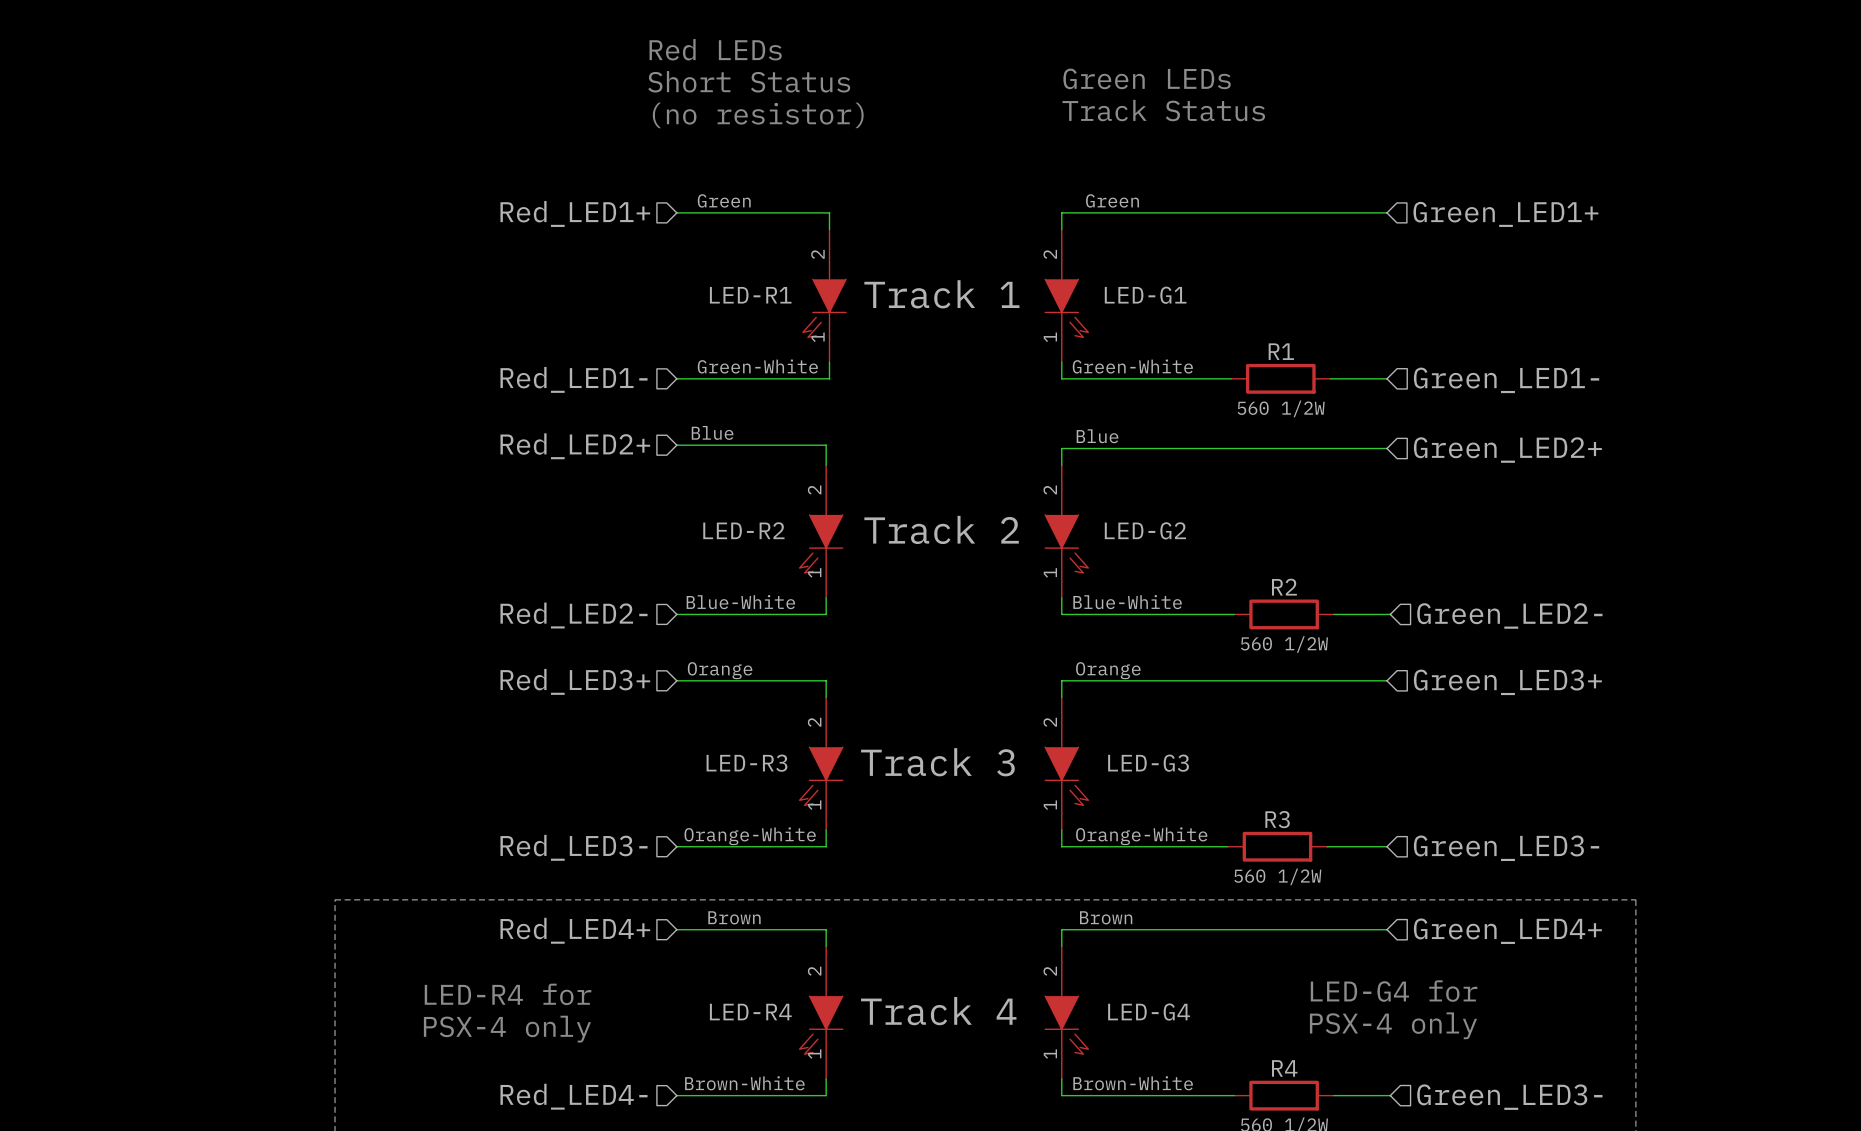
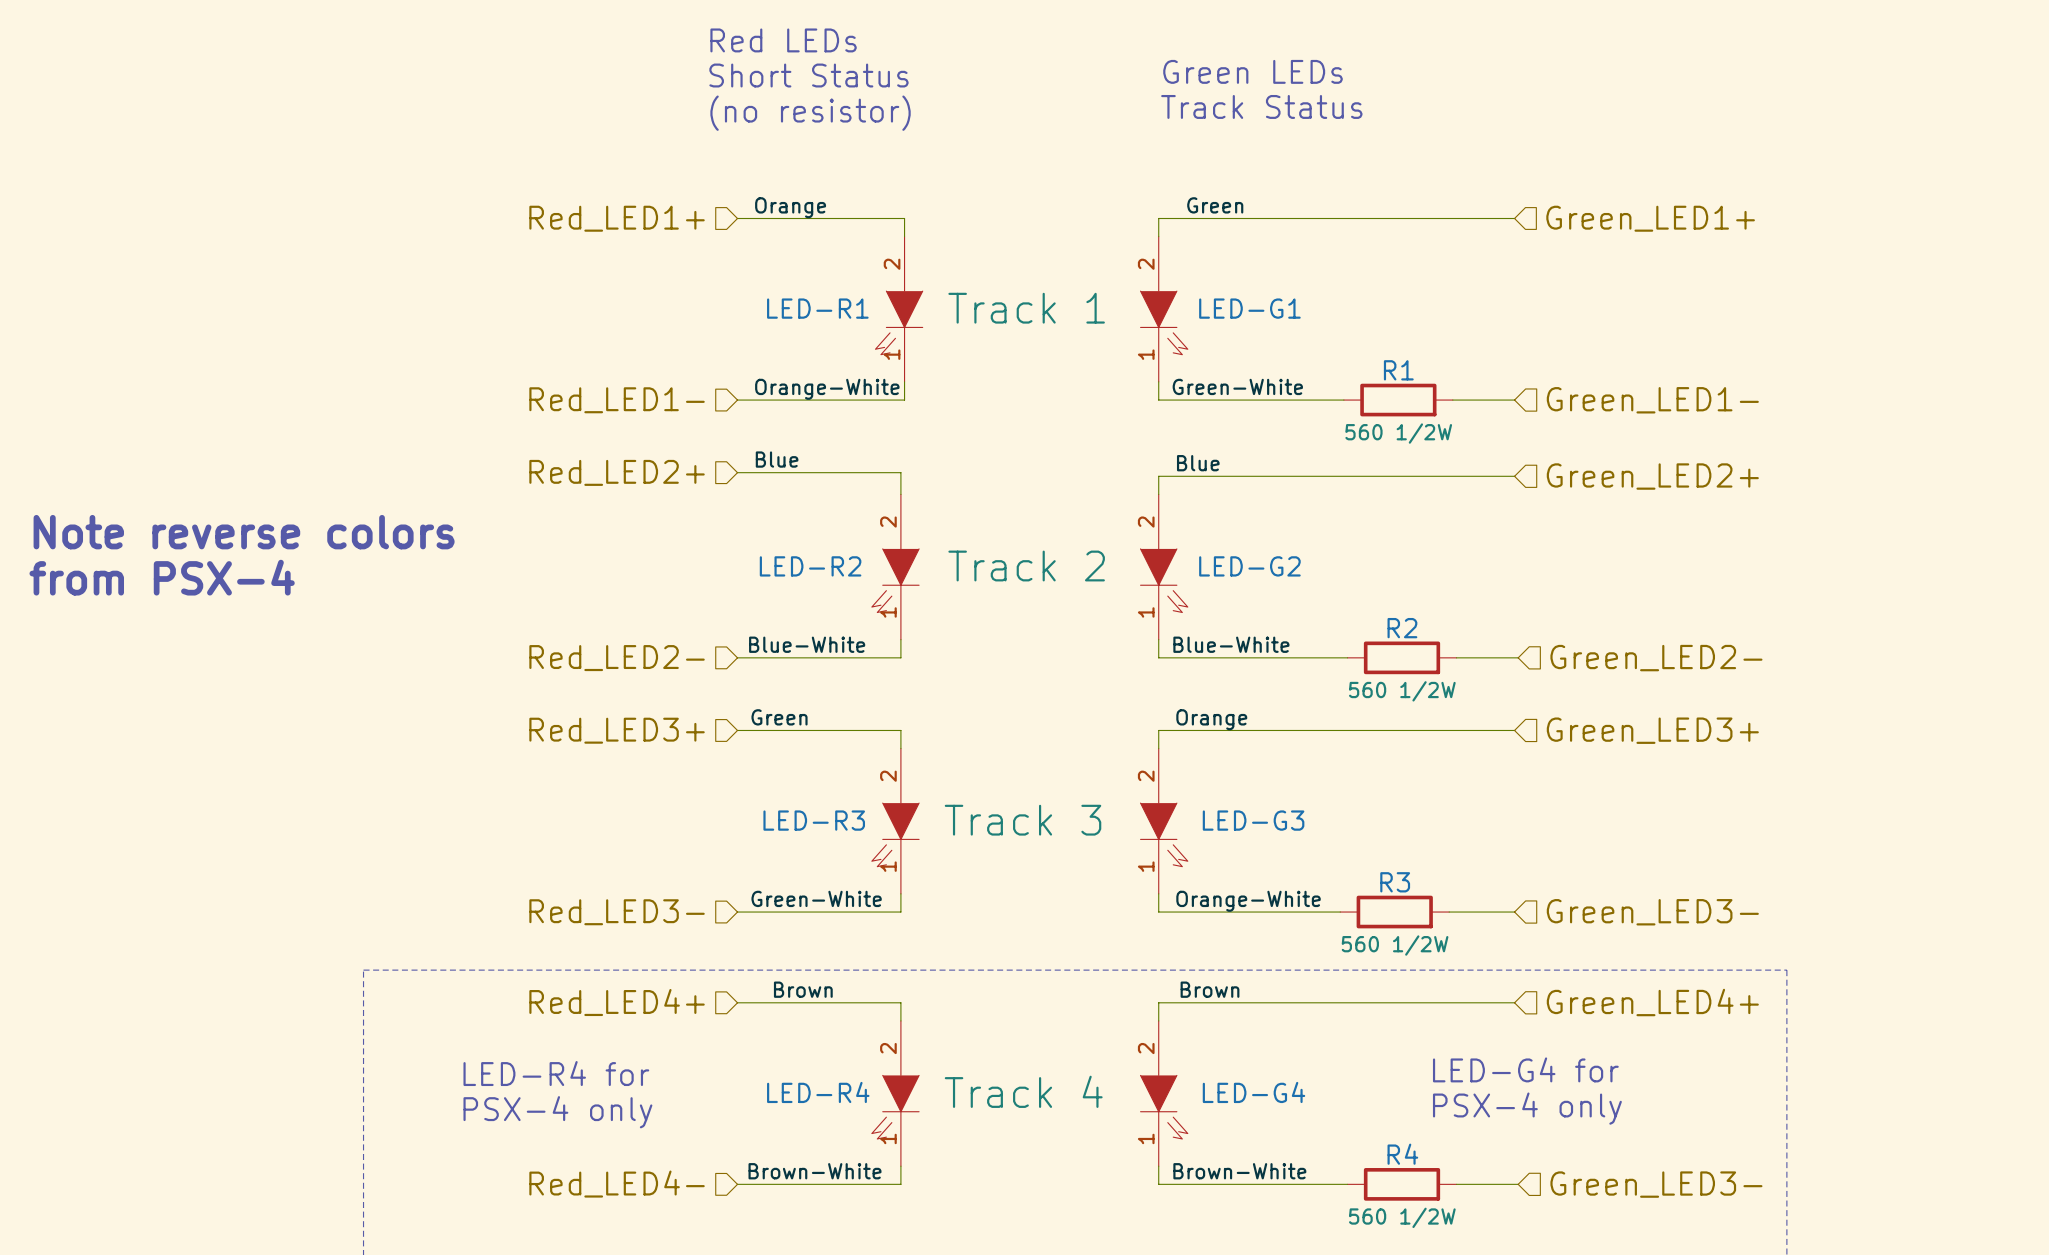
label: Green (724, 200) -> Orange (790, 207)
label: Green-White (757, 366) -> Orange-White (827, 389)
text: none -> Note reverse colors (244, 532)
text: none -> from PSX-4 (162, 577)
label: Orange (720, 670) -> Green (779, 717)
label: Orange-White (750, 836) -> Green-White (816, 898)

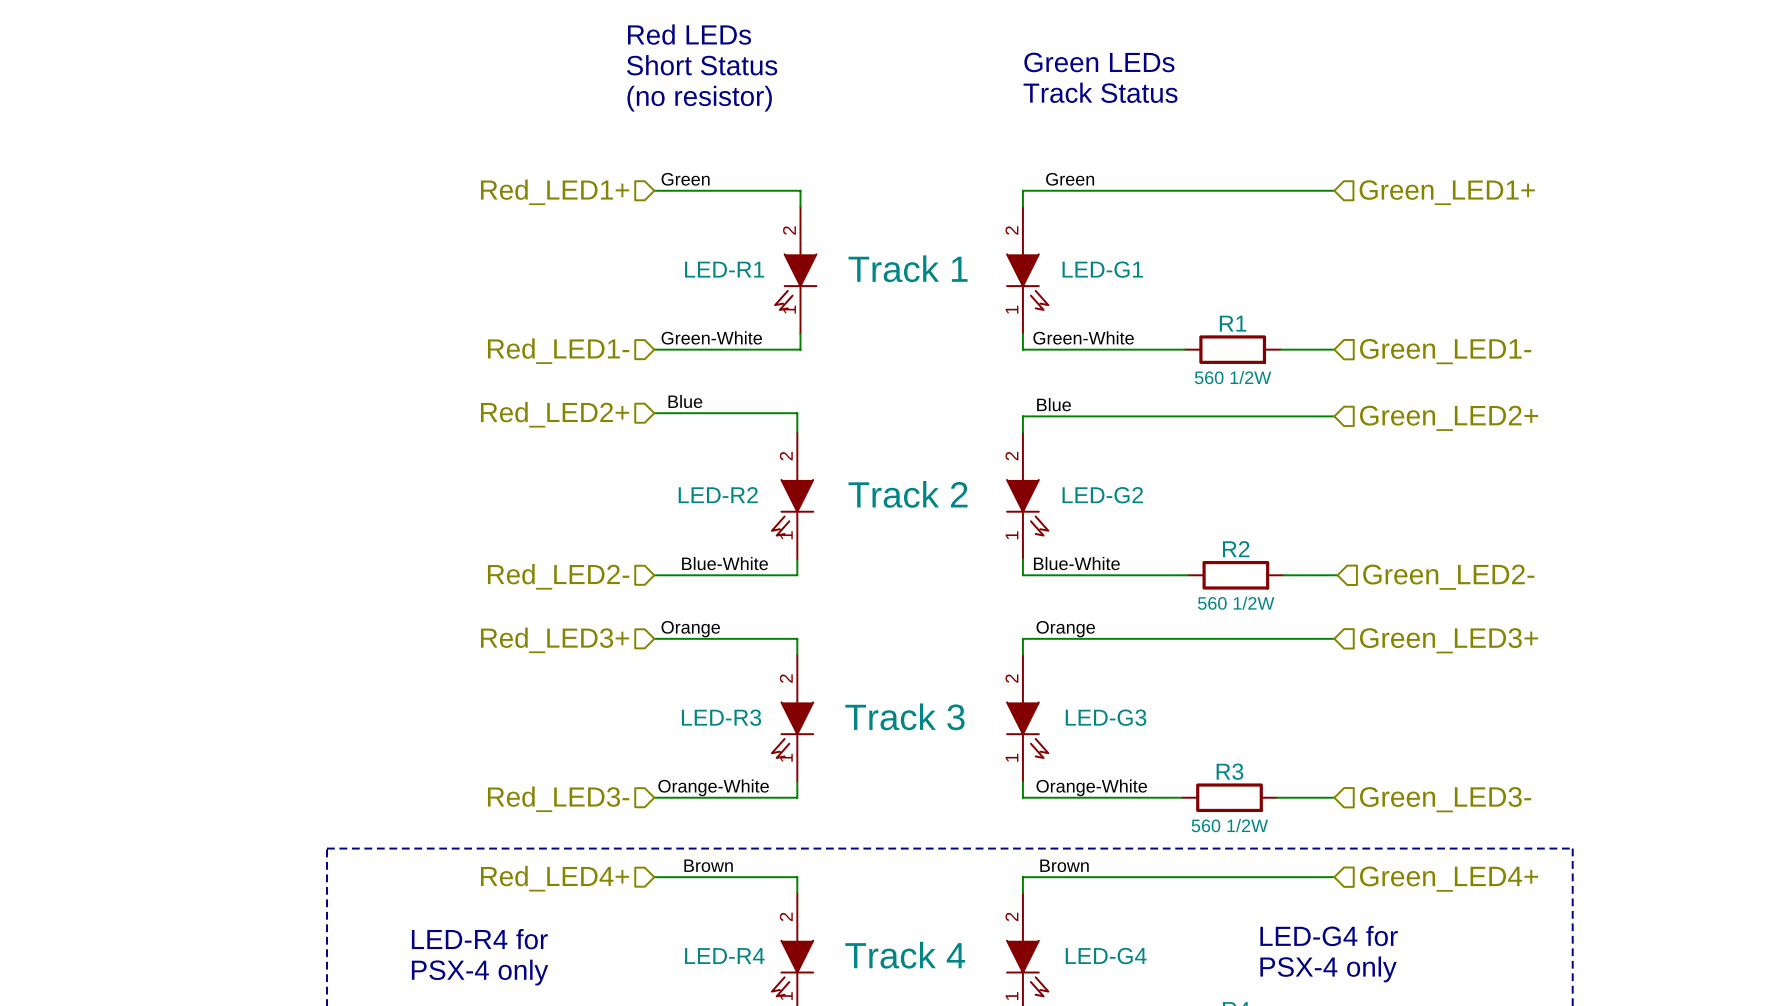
label: Orange (790, 207) -> Green (685, 179)
label: Orange-White (827, 389) -> Green-White (711, 337)
text: Note reverse colors (244, 532) -> none
text: from PSX-4 (162, 577) -> none
label: Green (779, 717) -> Orange (690, 629)
label: Green-White (816, 898) -> Orange-White (713, 787)

